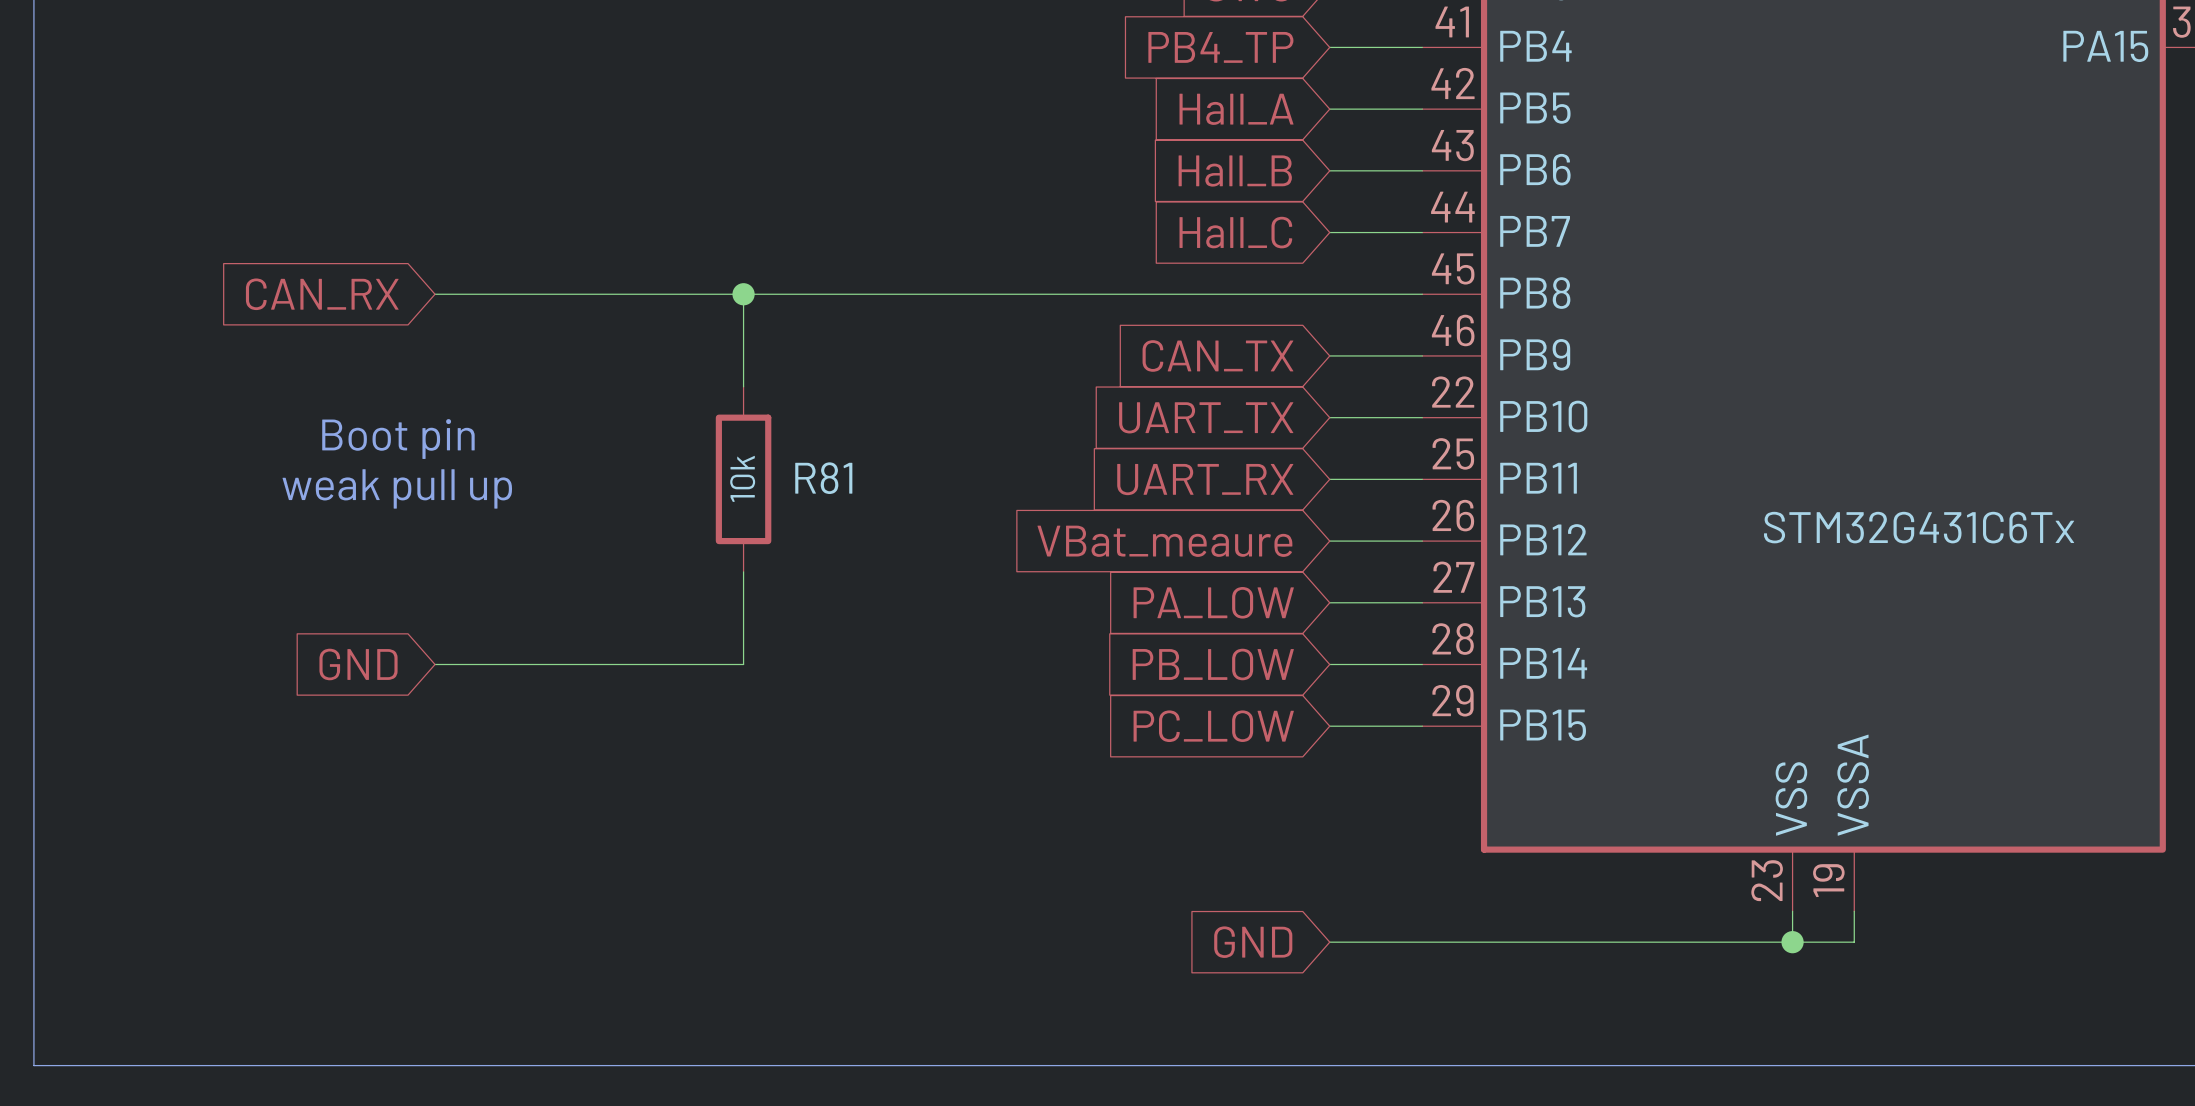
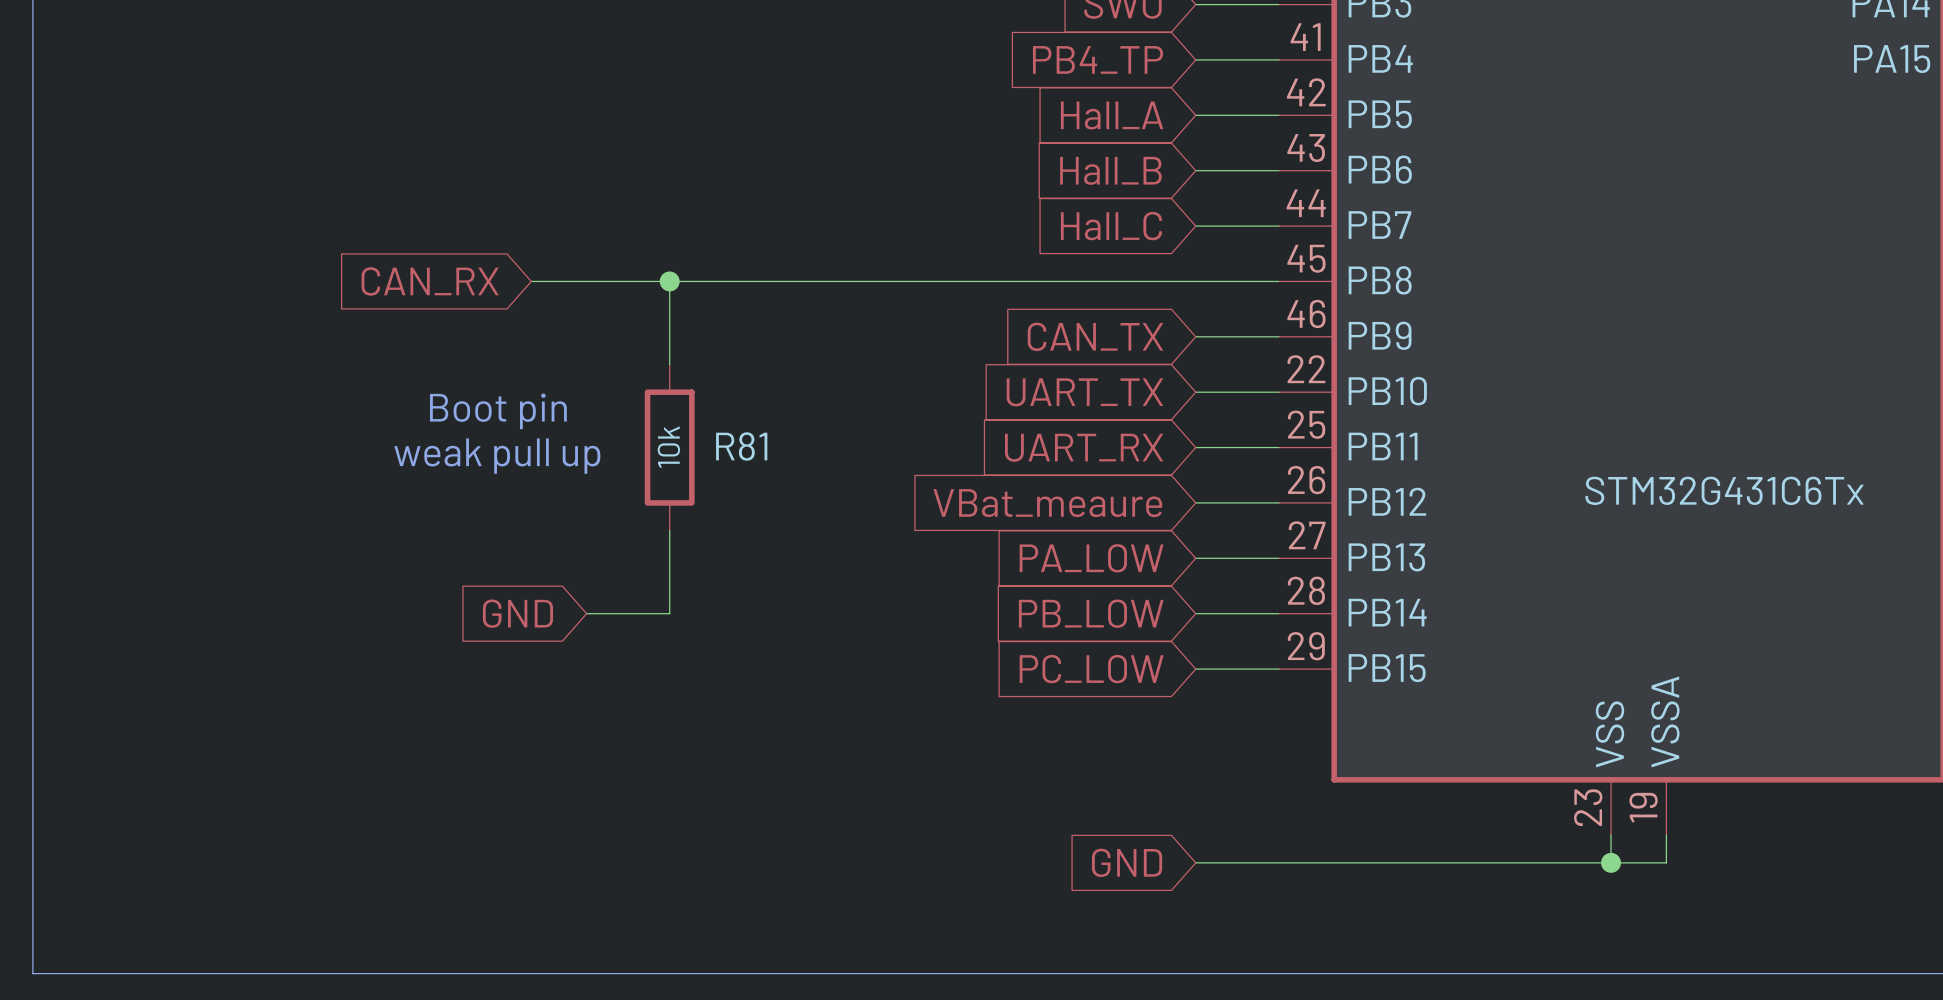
global label position: CAN_RX (322, 294) -> CAN_RX (430, 281)
wire: (435, 294) (589, 294) -> none
text position: Boot pin (398, 439) -> Boot pin (498, 411)
text position: weak pull up (397, 488) -> weak pull up (497, 456)
global label position: GND (358, 664) -> GND (517, 613)
wire: (435, 664) (651, 664) -> none

